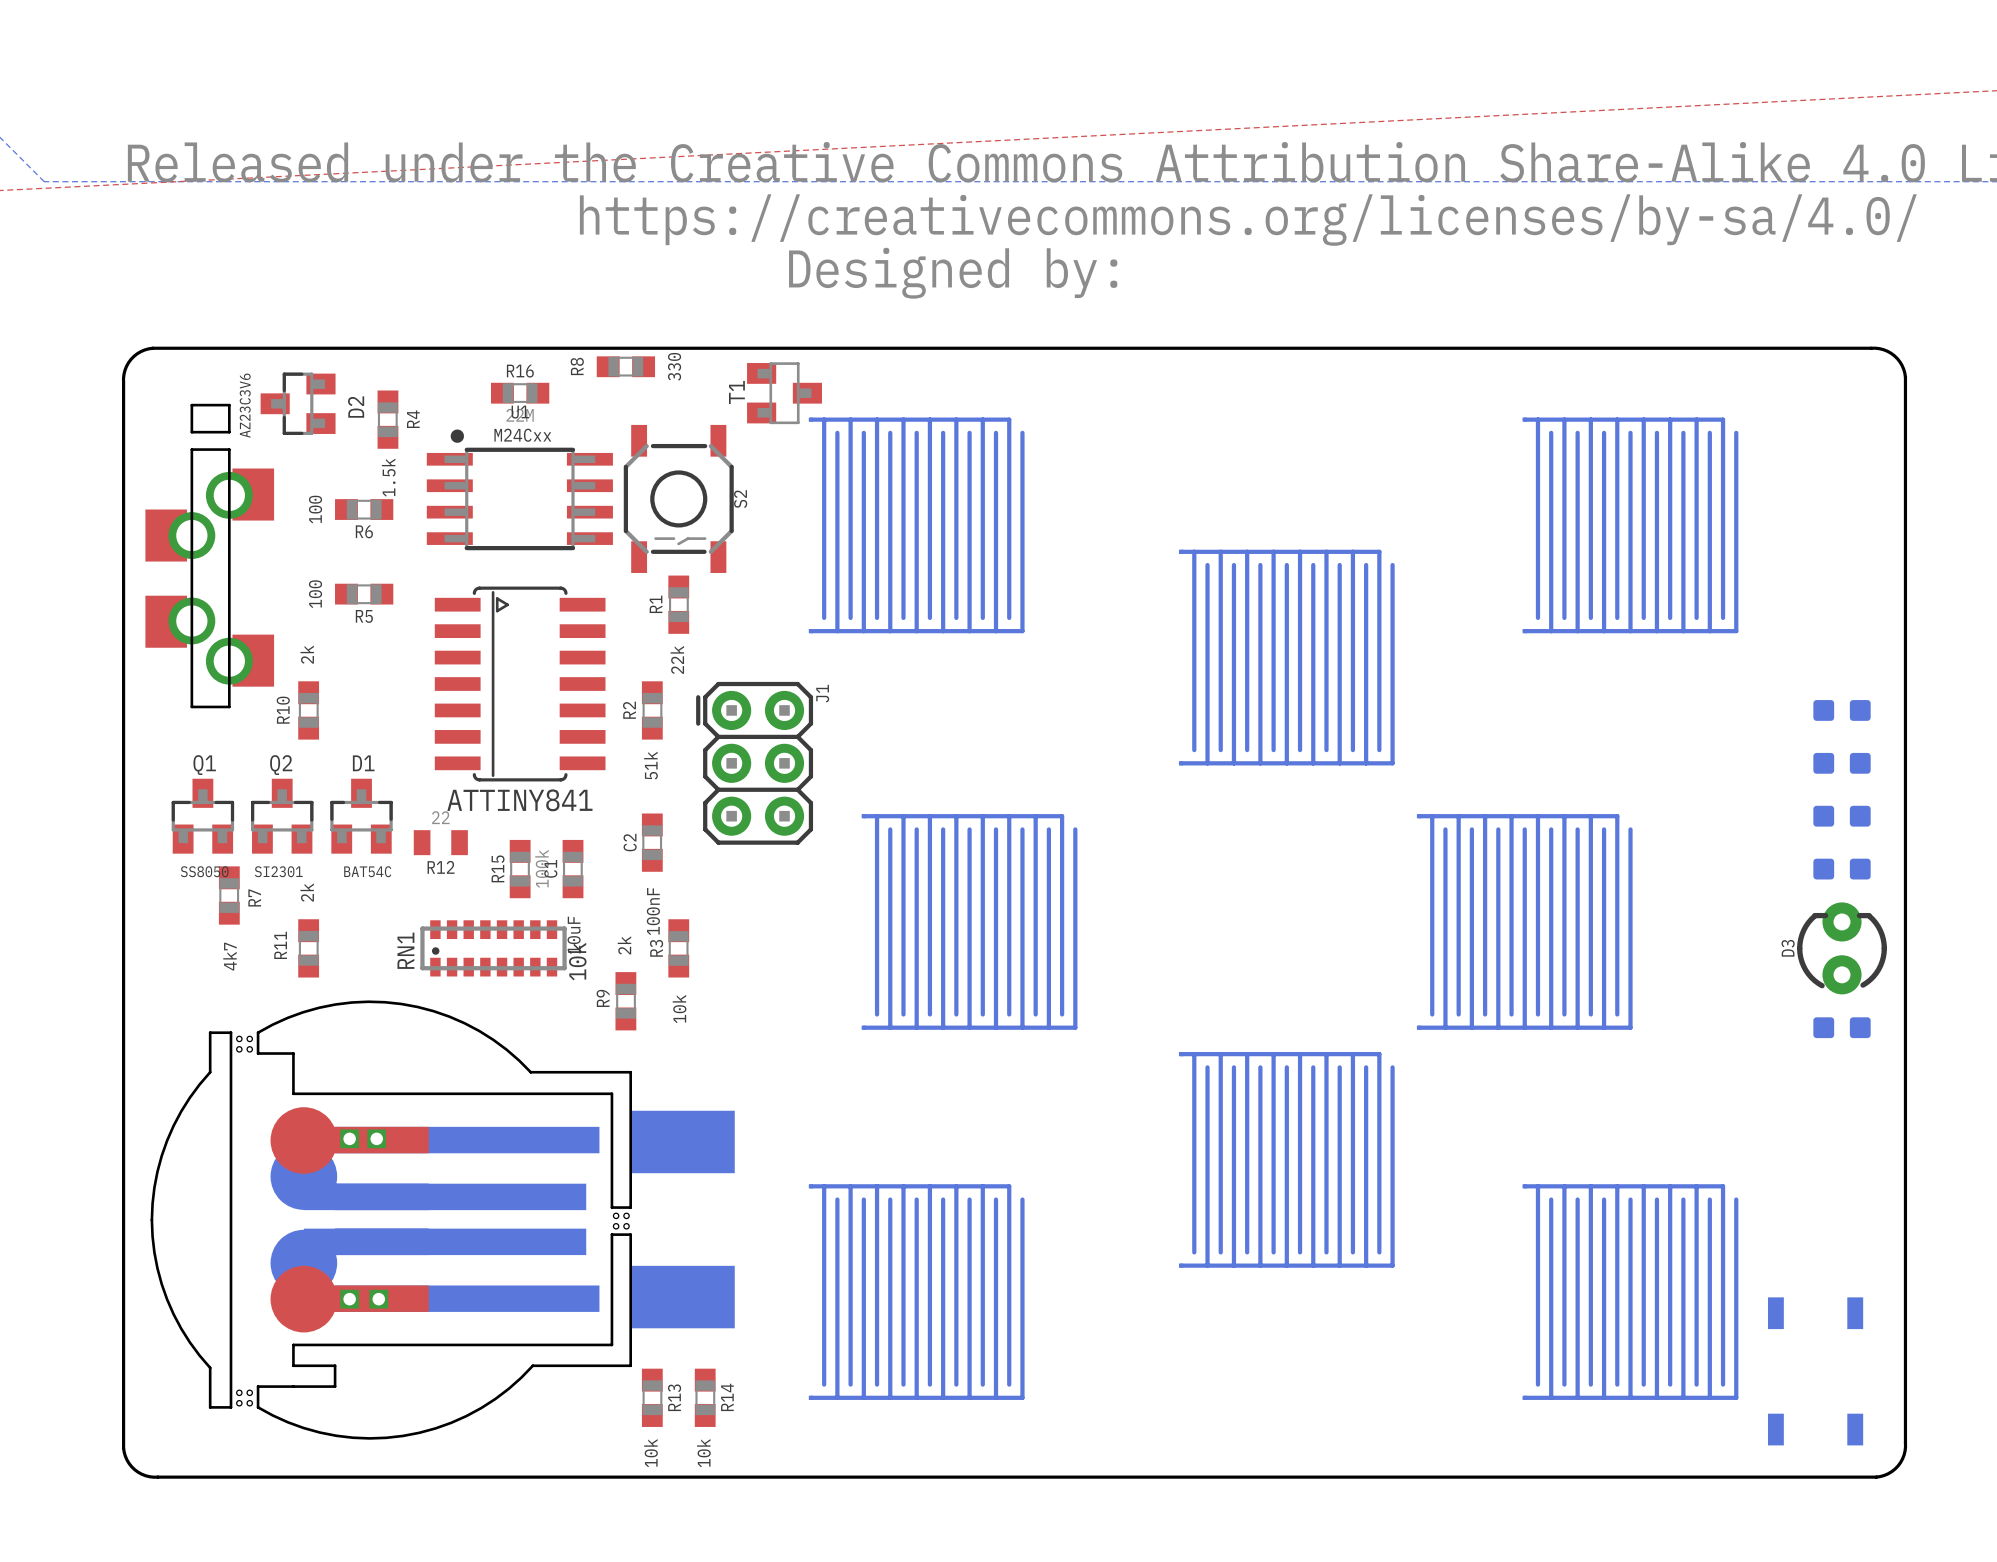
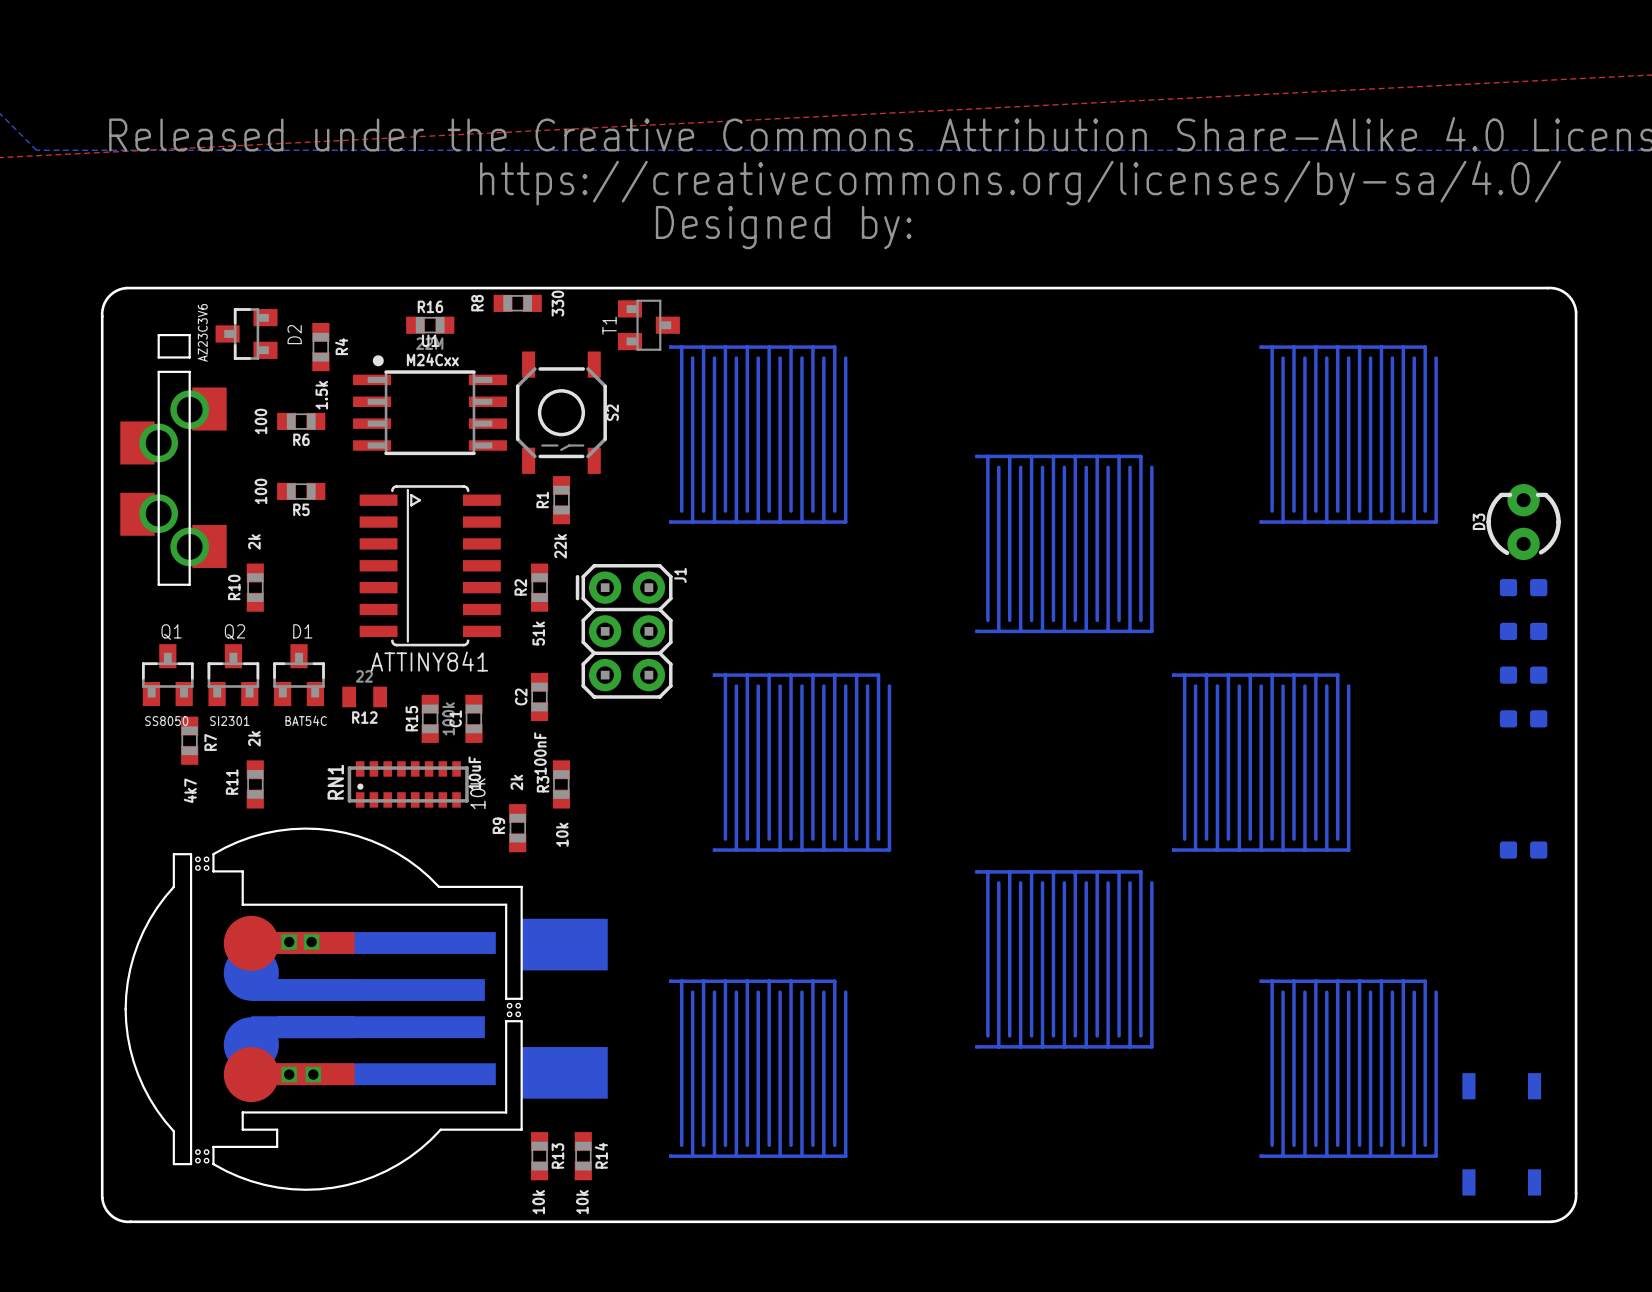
D3 position: (1842, 948) -> (1523, 522)

